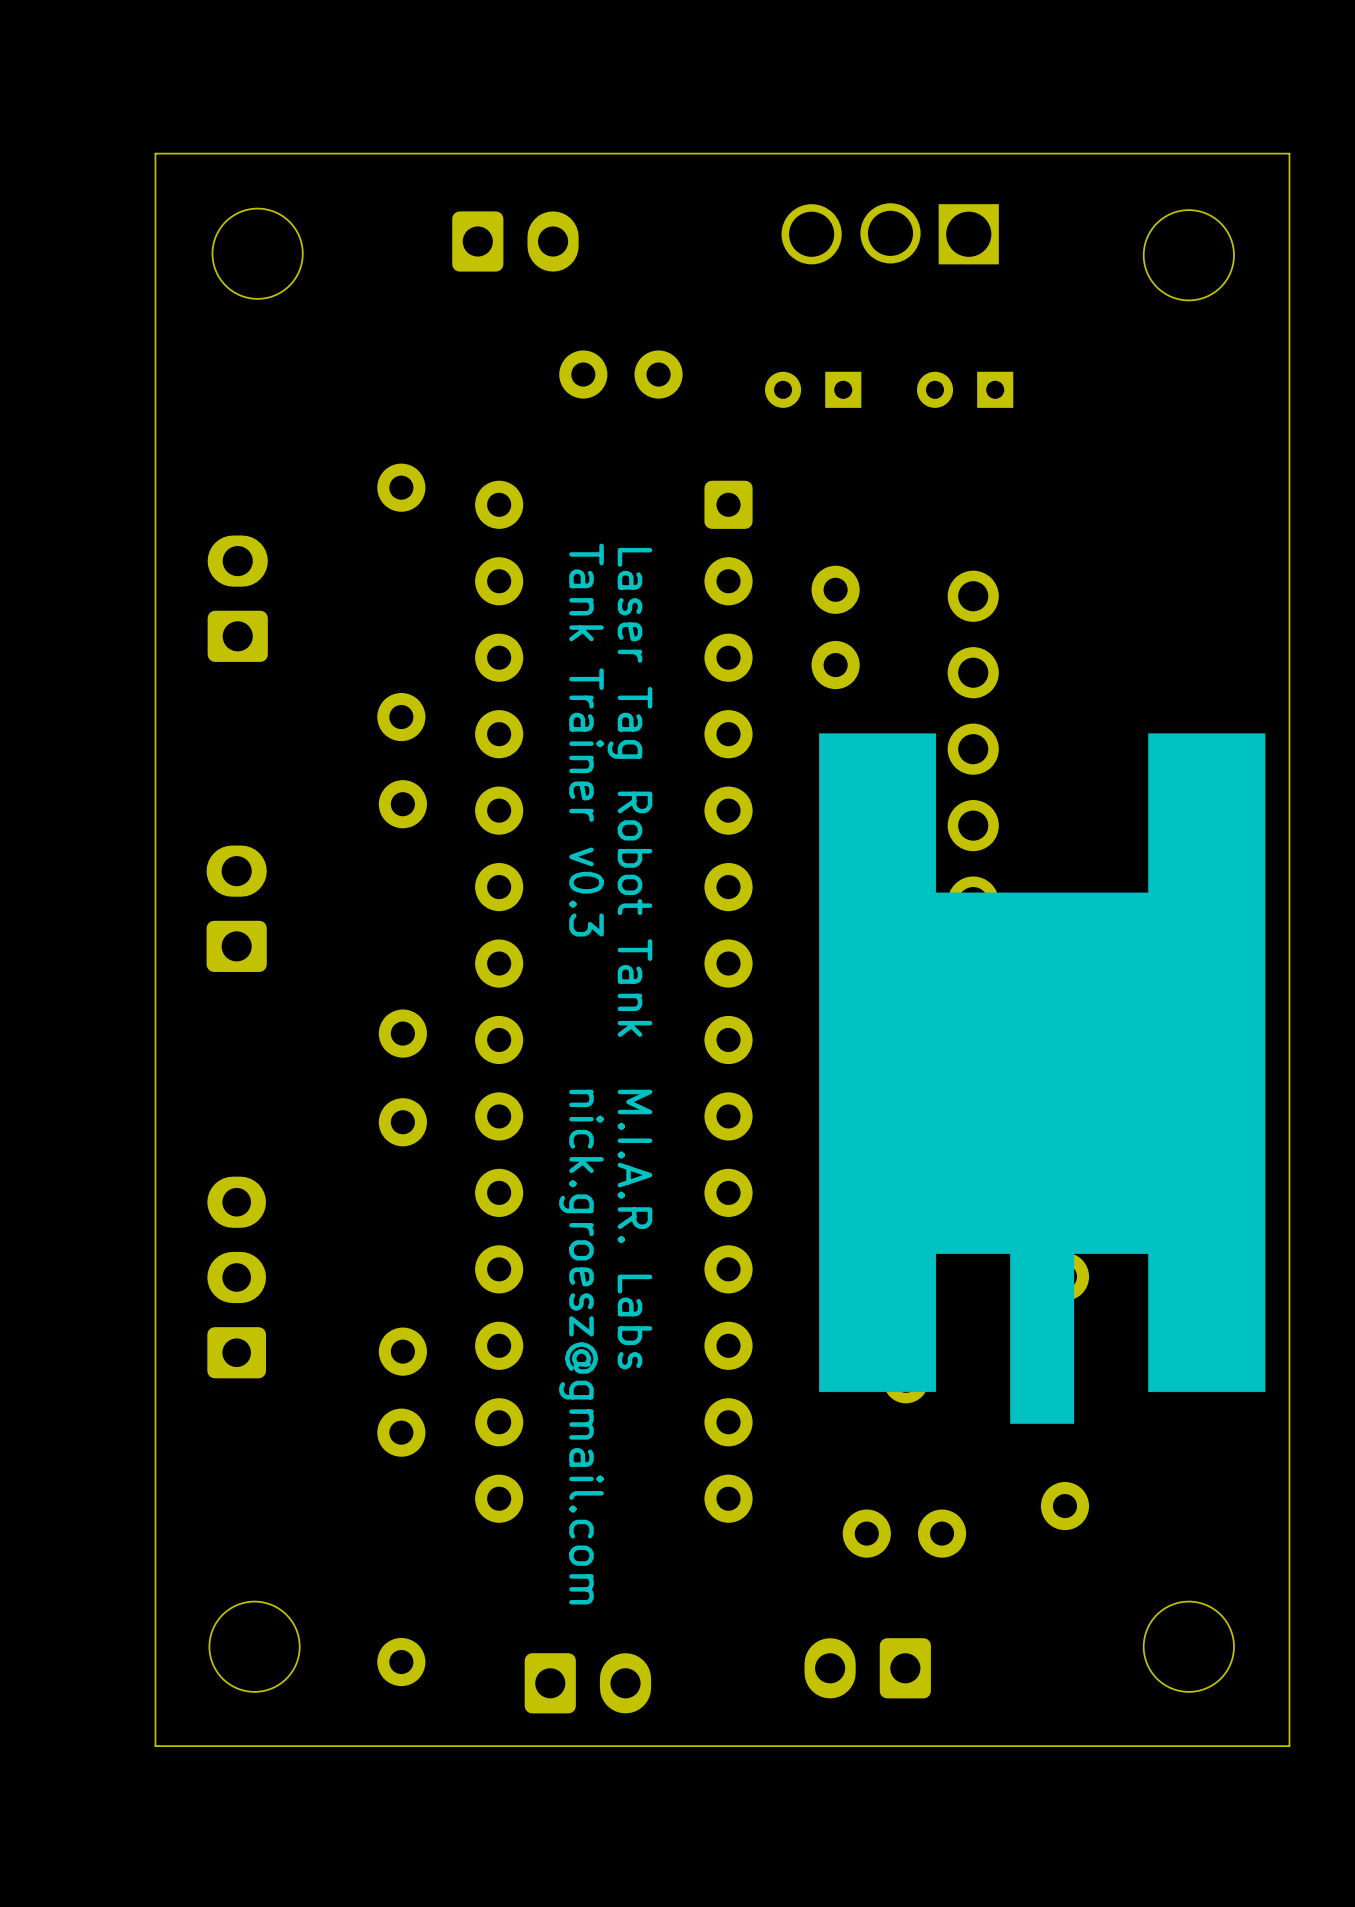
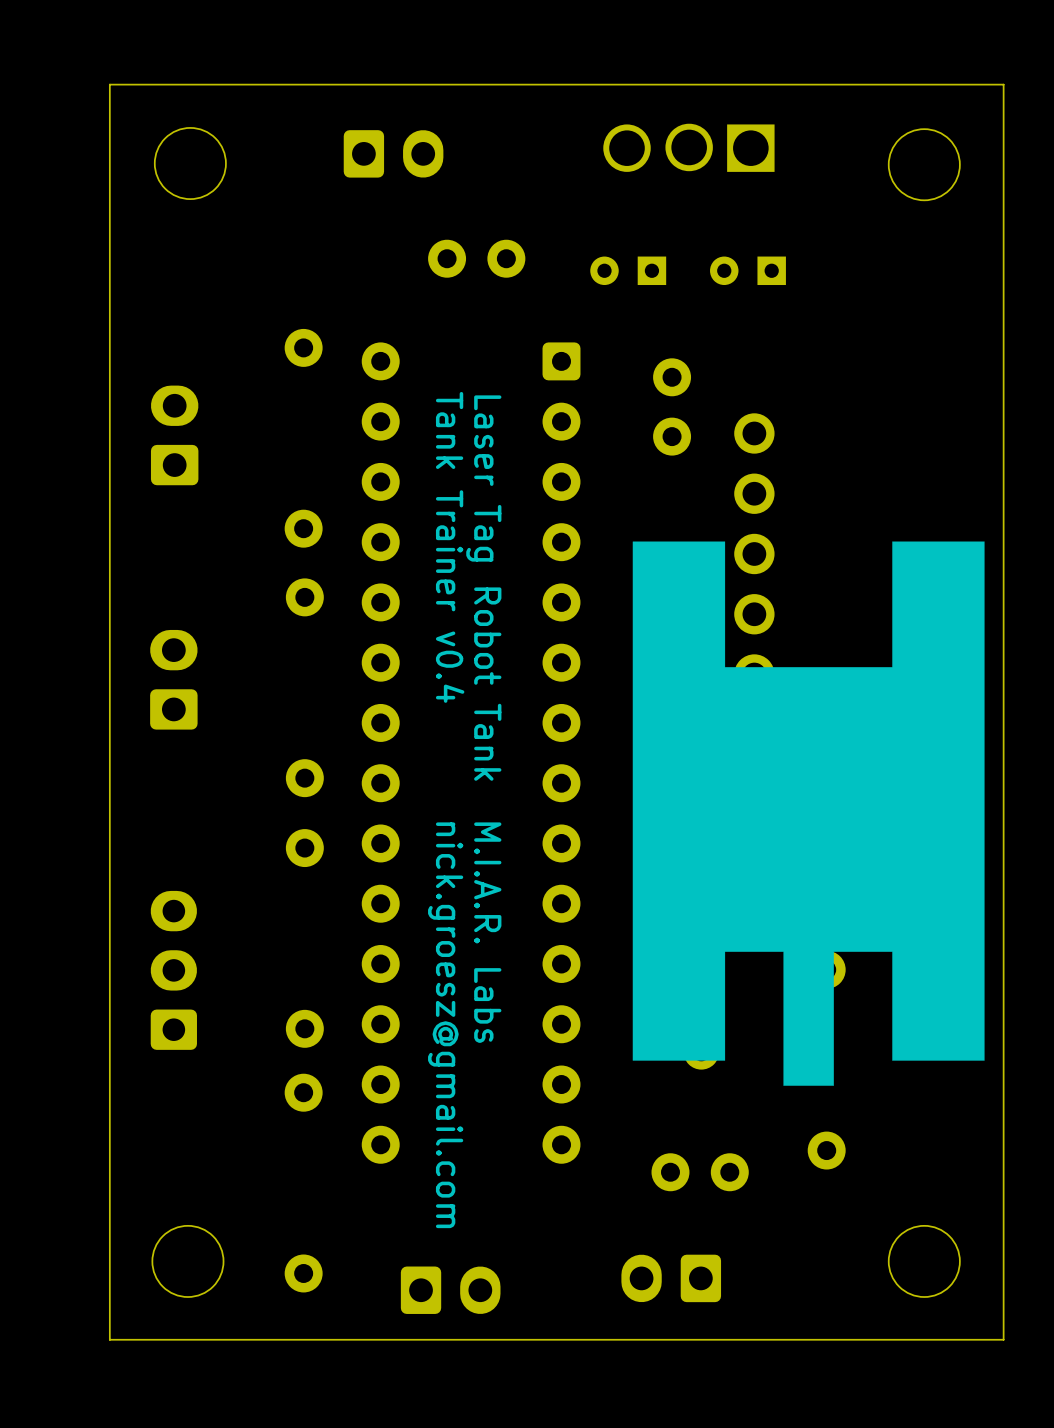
part position: (835, 627) -> (672, 406)
text: Tank Trainer v0.3 (586, 740) -> Tank Trainer v0.4 (450, 547)

